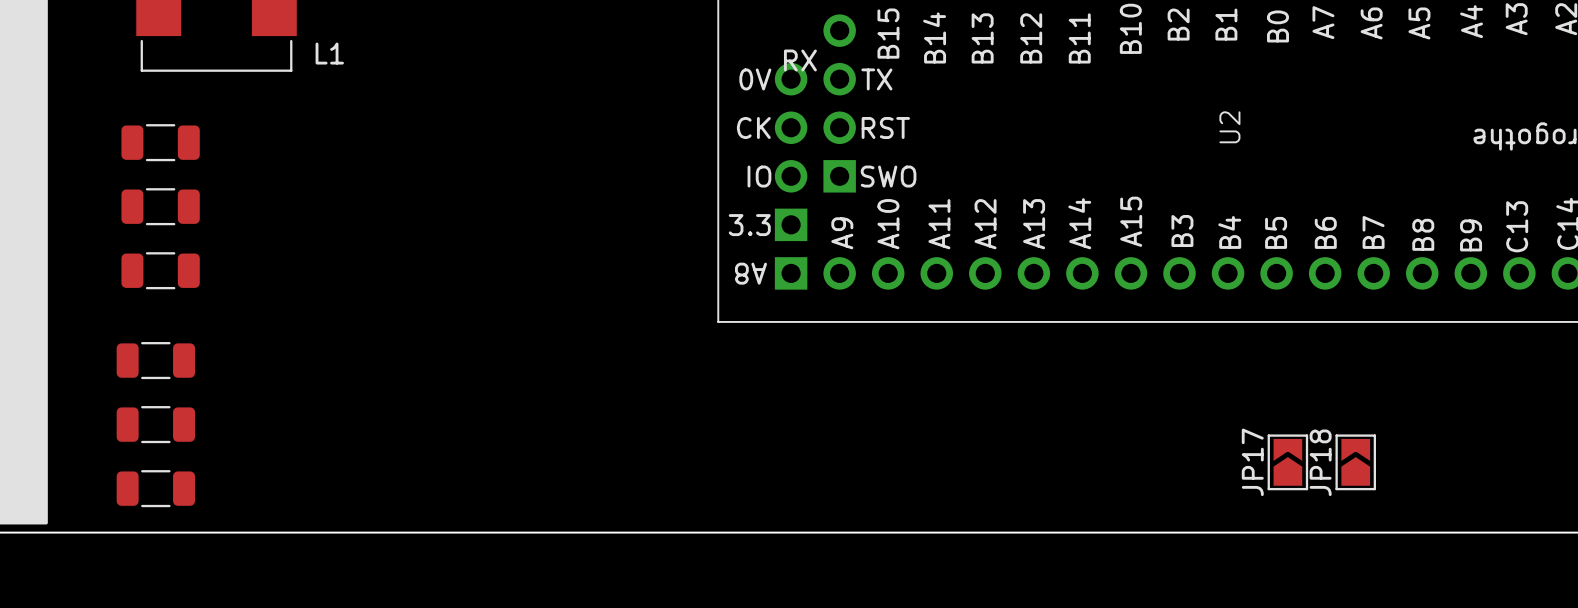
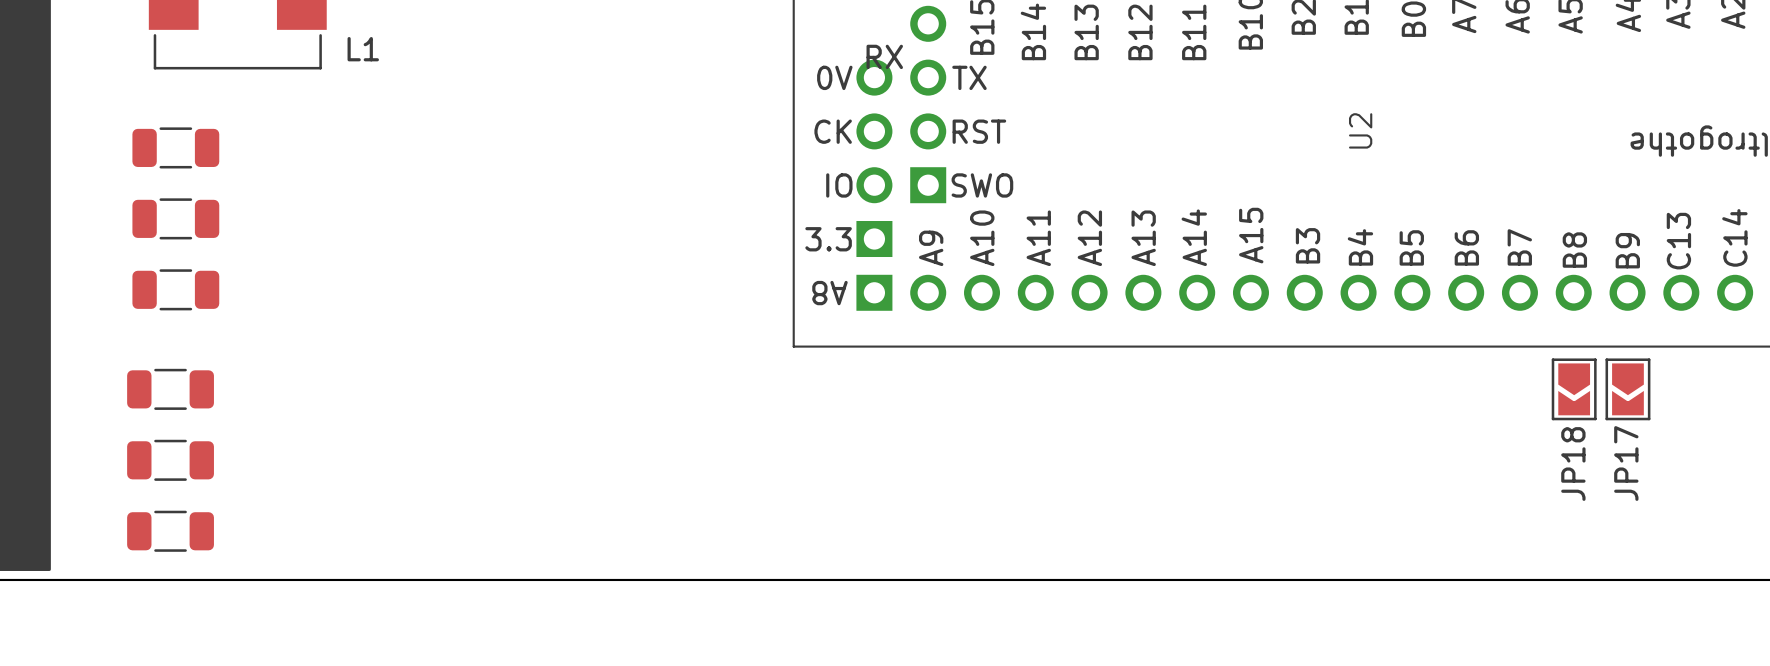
JP17 name position: JP17 (1252, 462) -> JP17 (1626, 463)
JP17 rotation: 0° (1287, 462) -> 180° (1627, 389)
JP17 position: (1287, 462) -> (1627, 389)
JP18 name position: JP18 (1320, 462) -> JP18 (1573, 464)
JP18 rotation: 0° (1355, 462) -> 180° (1574, 389)
JP18 position: (1355, 462) -> (1574, 389)

